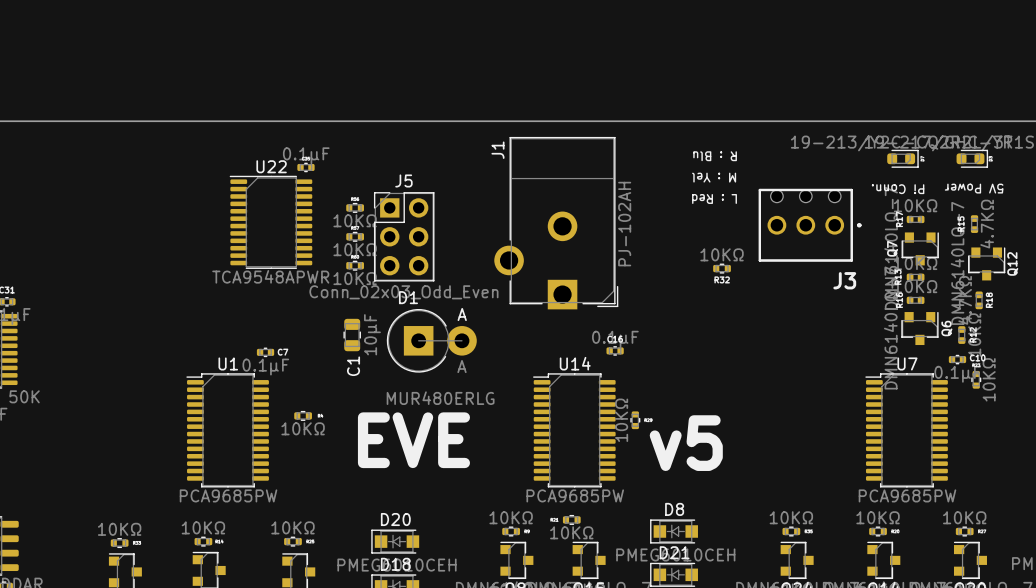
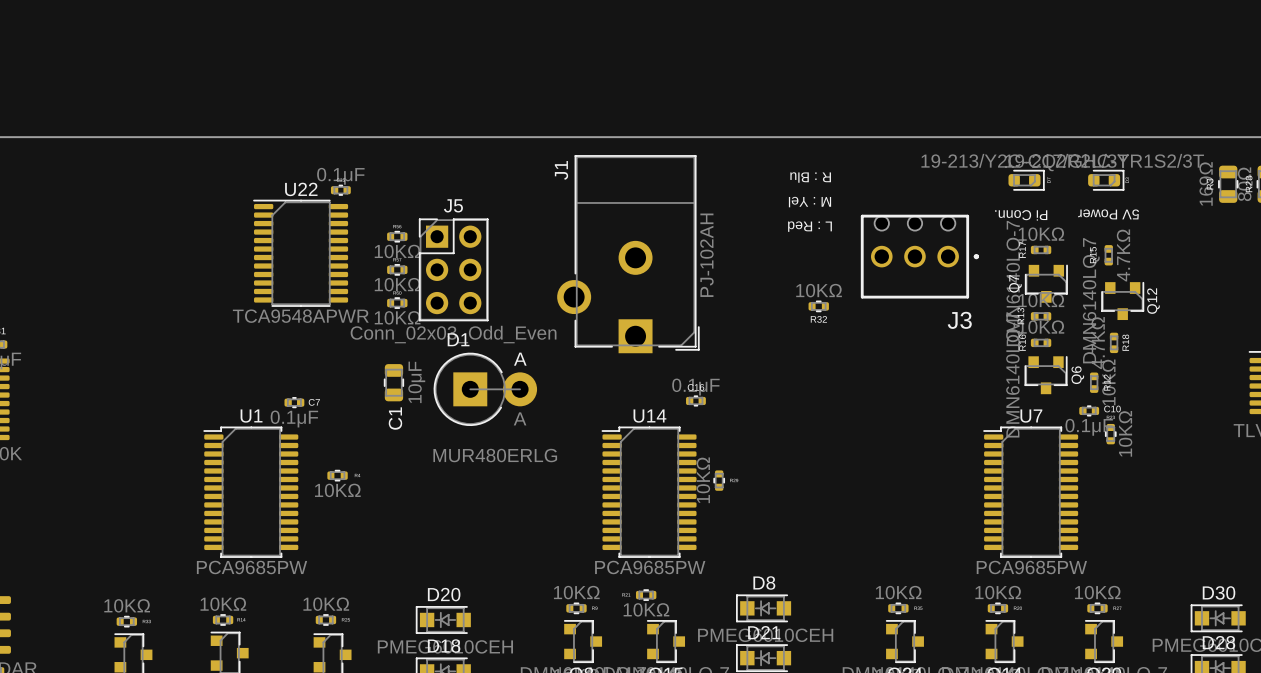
text: EVE (413, 440) -> none
text: v5 (686, 443) -> none

